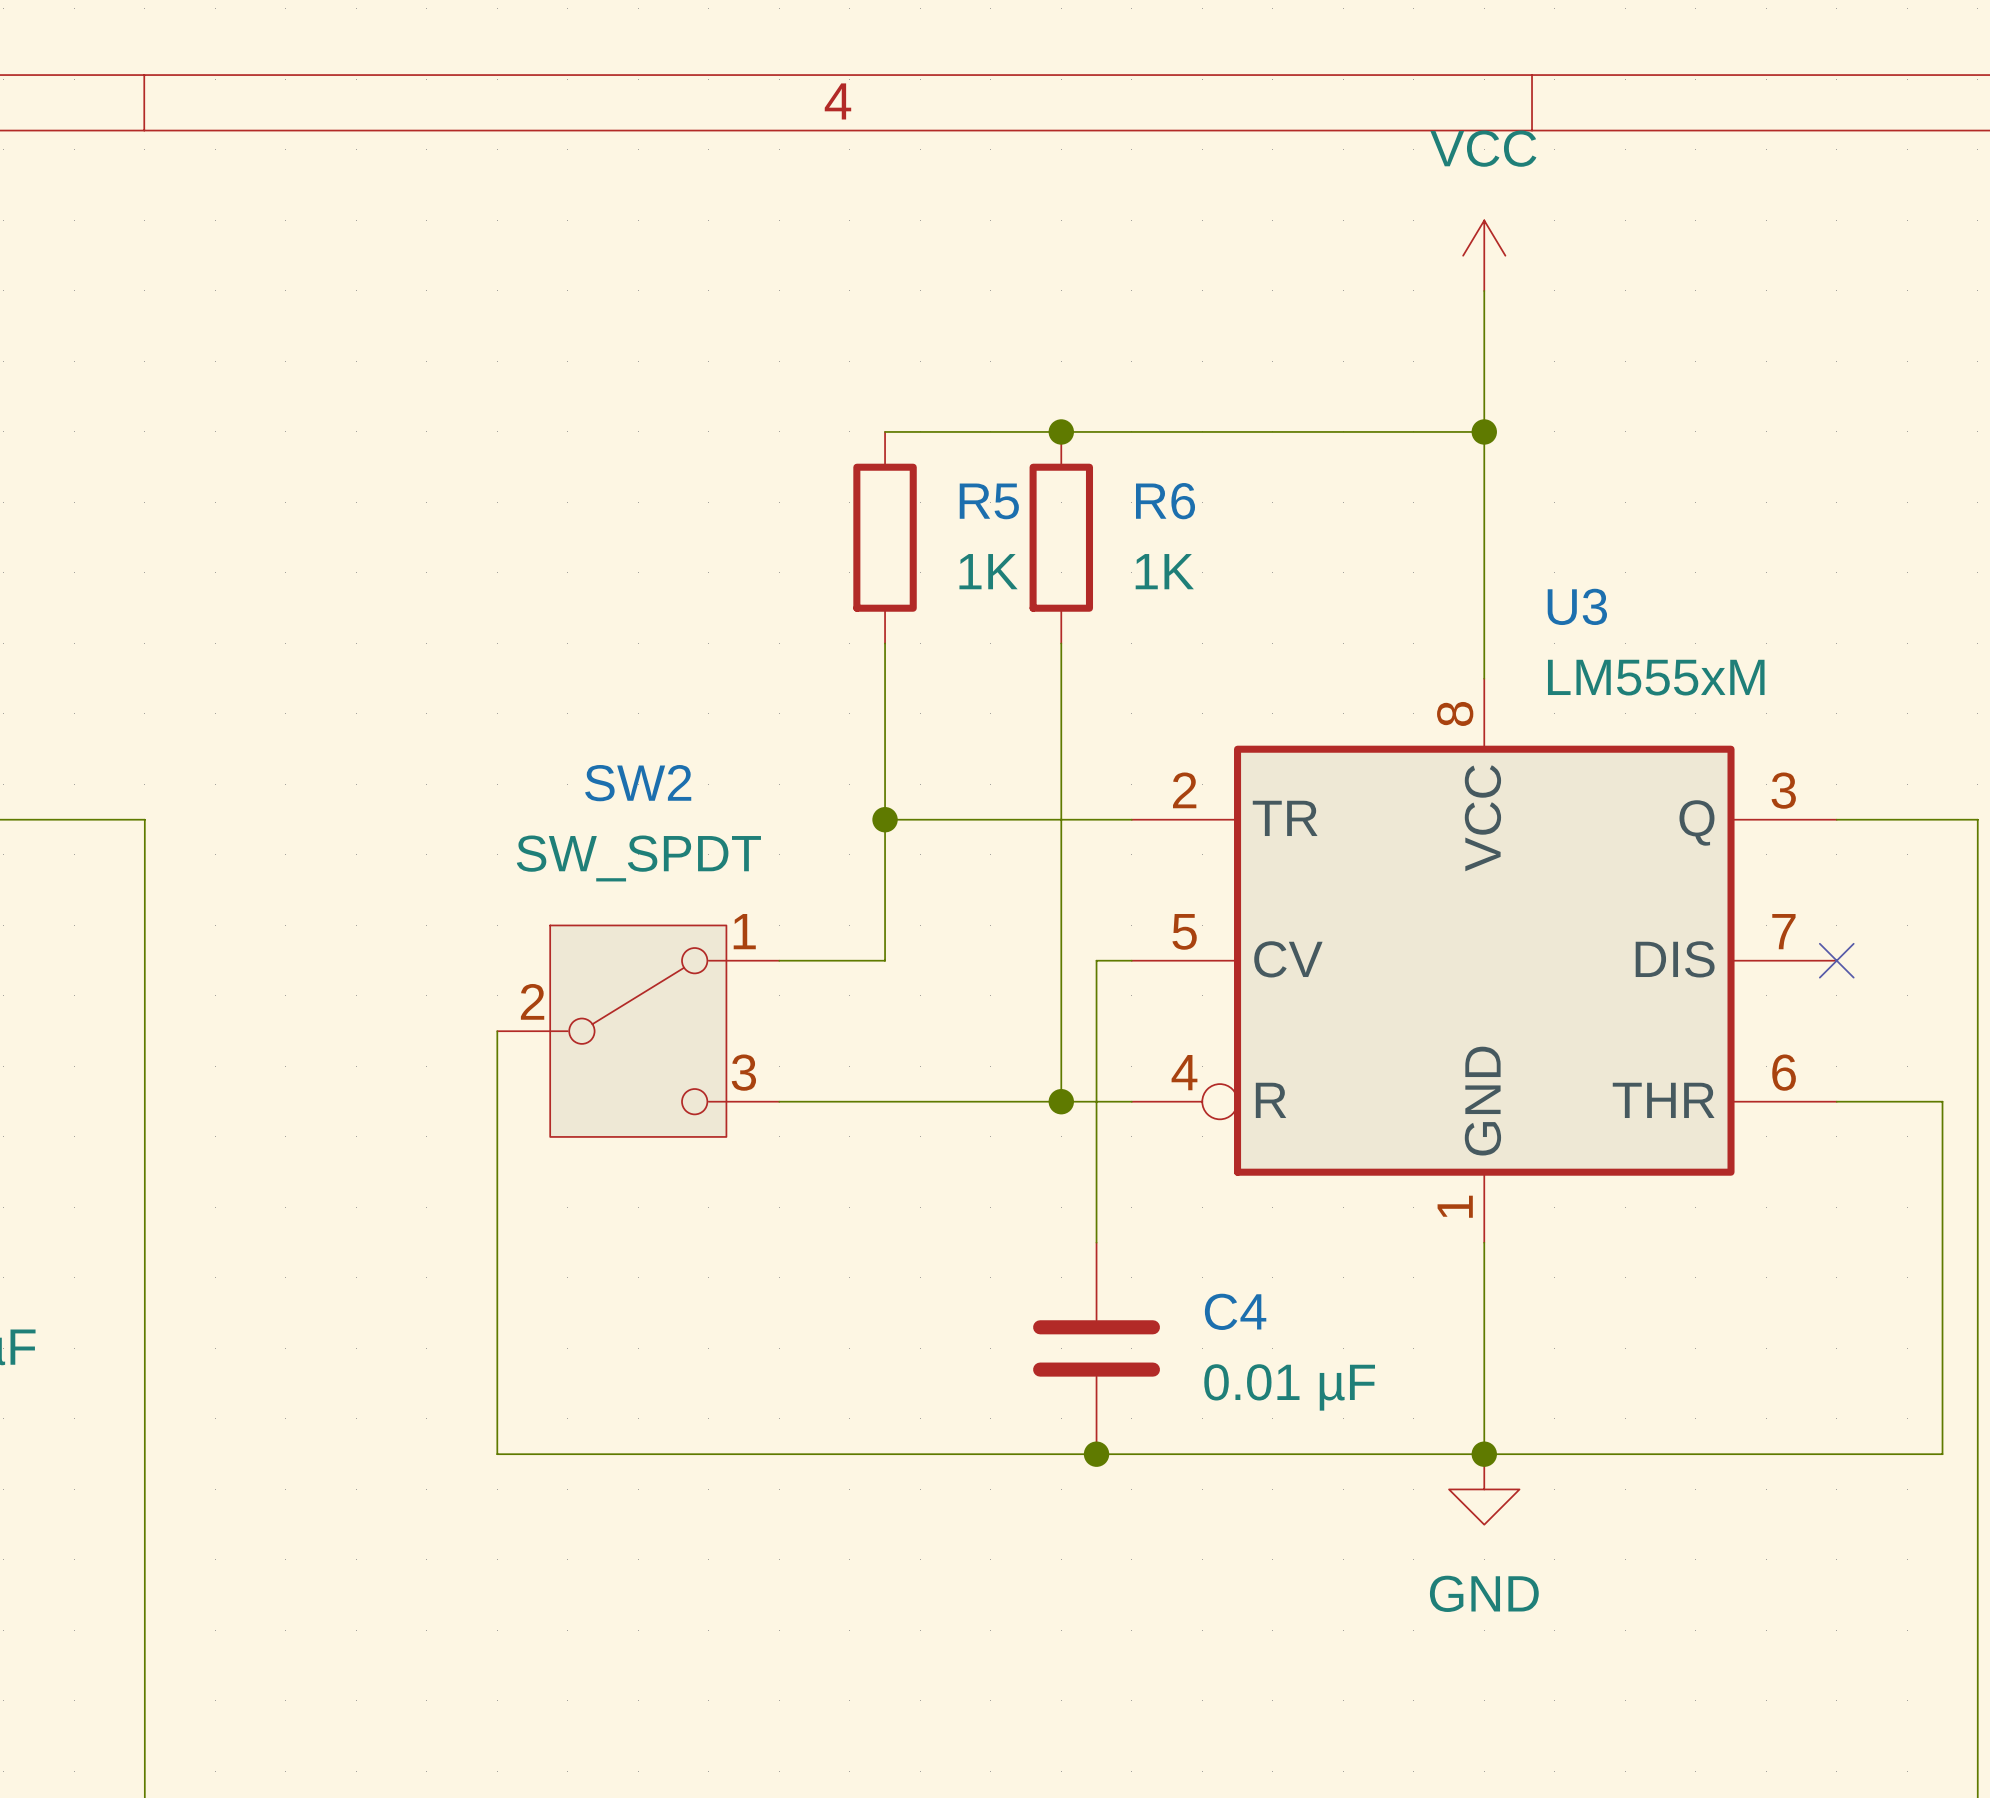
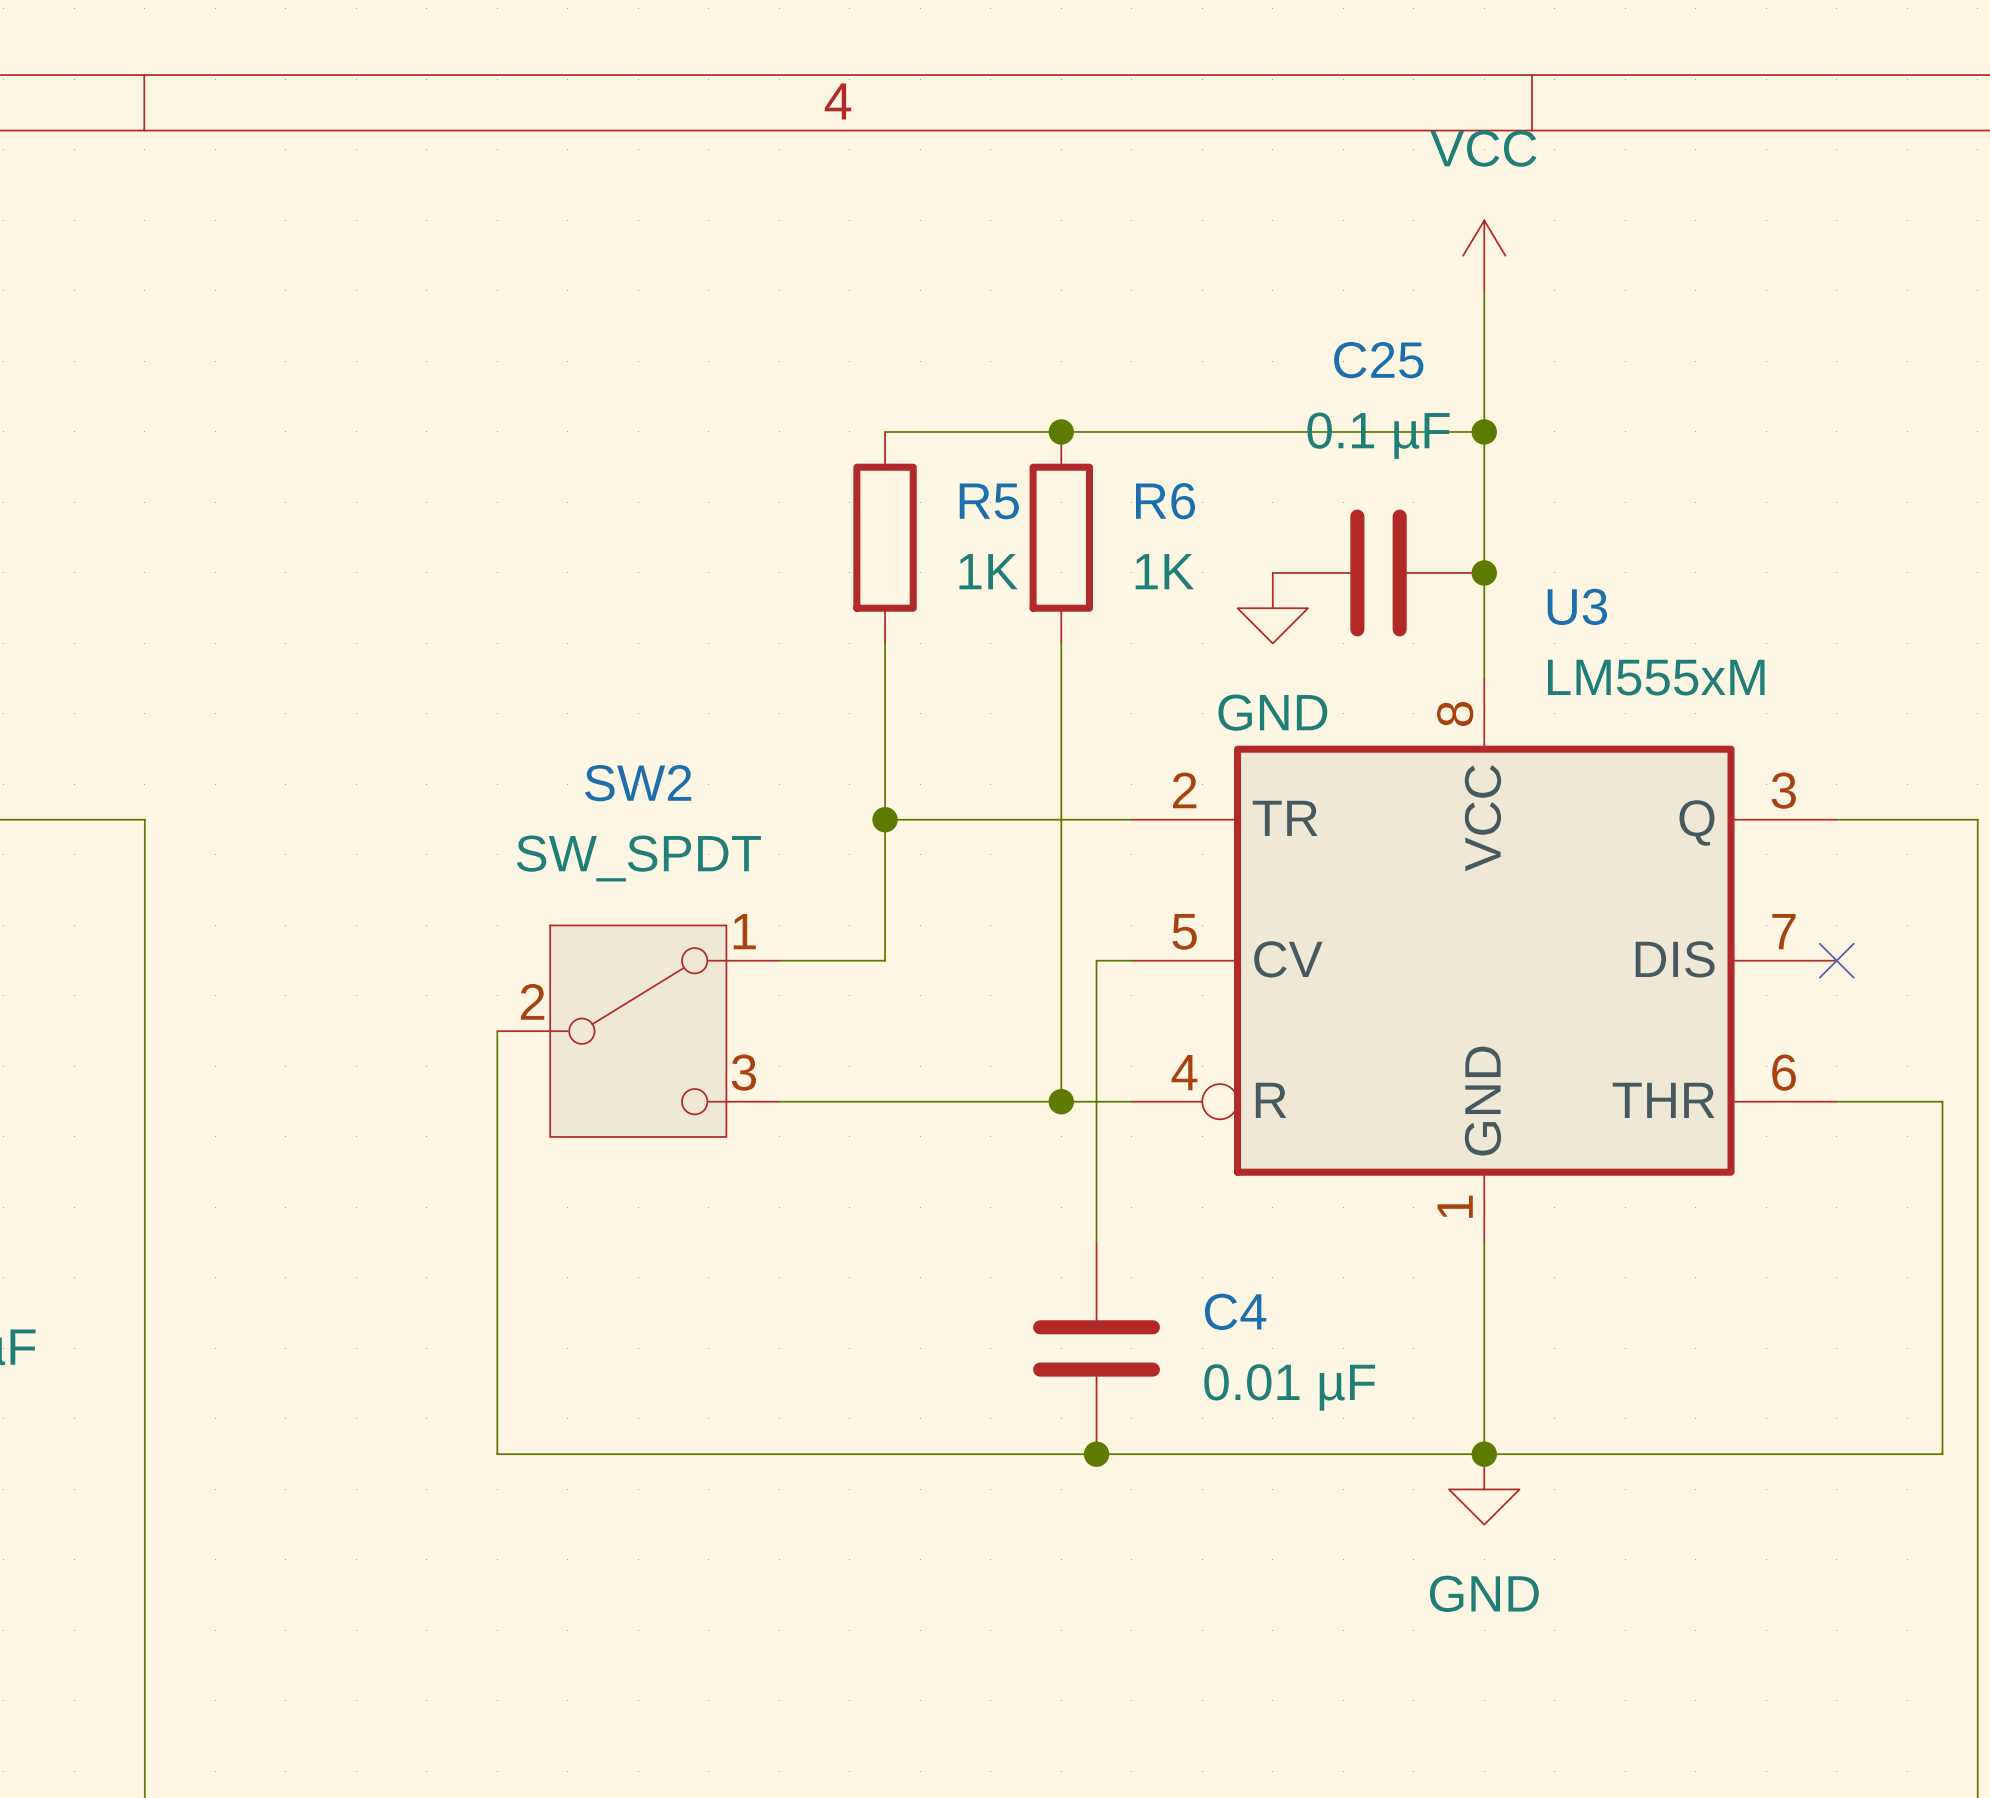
C25: none -> 0.1 µF (1378, 572)
junction: none -> (1484, 572)
power symbol: none -> GND (1272, 608)

